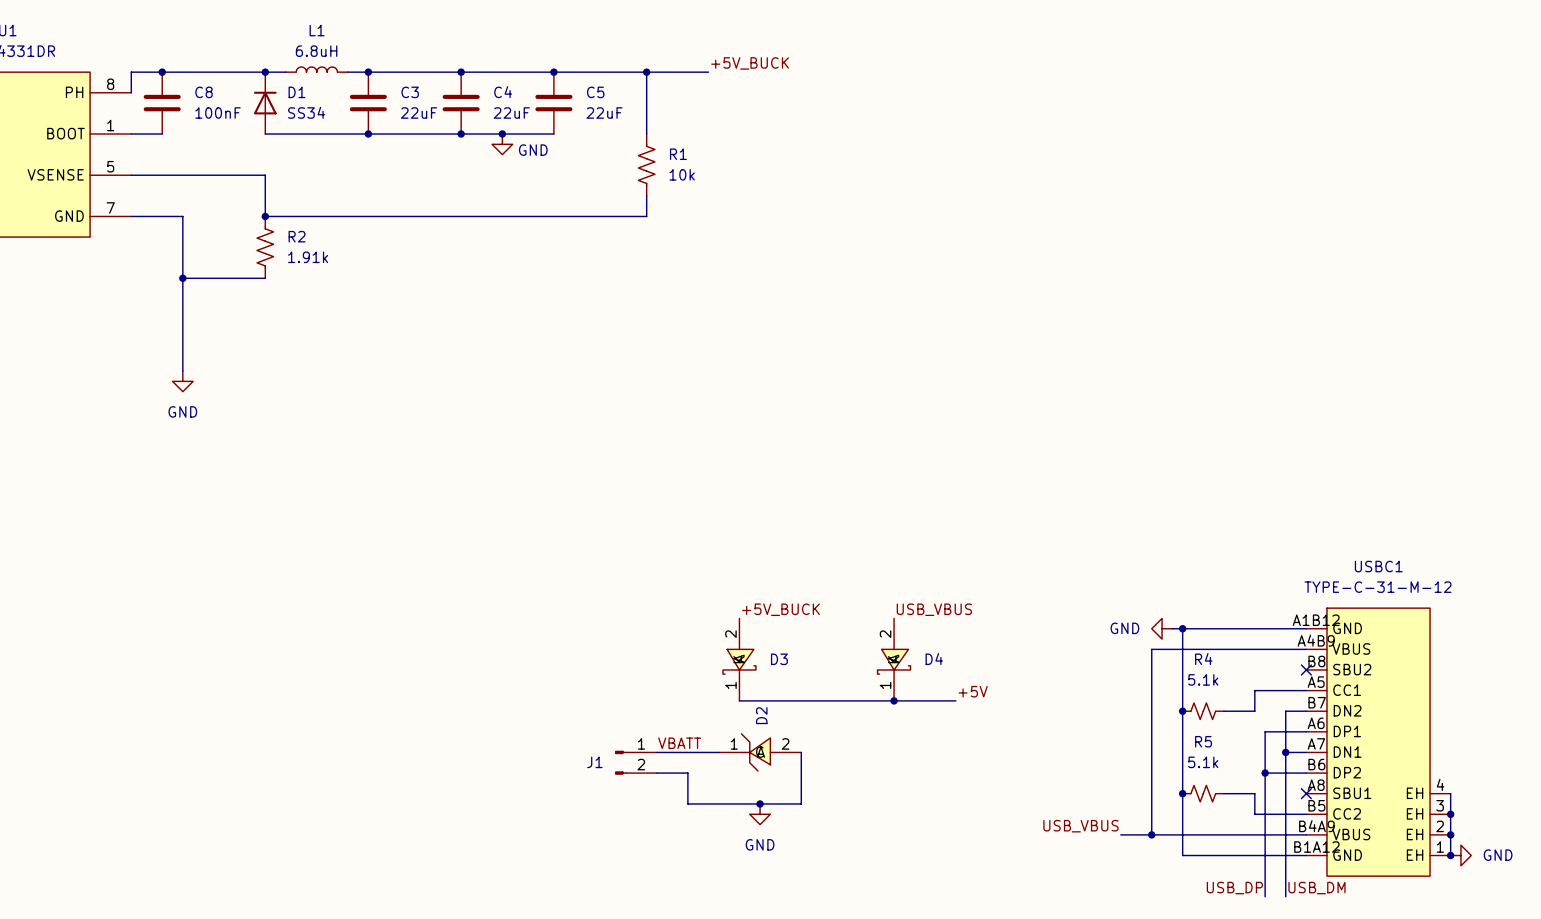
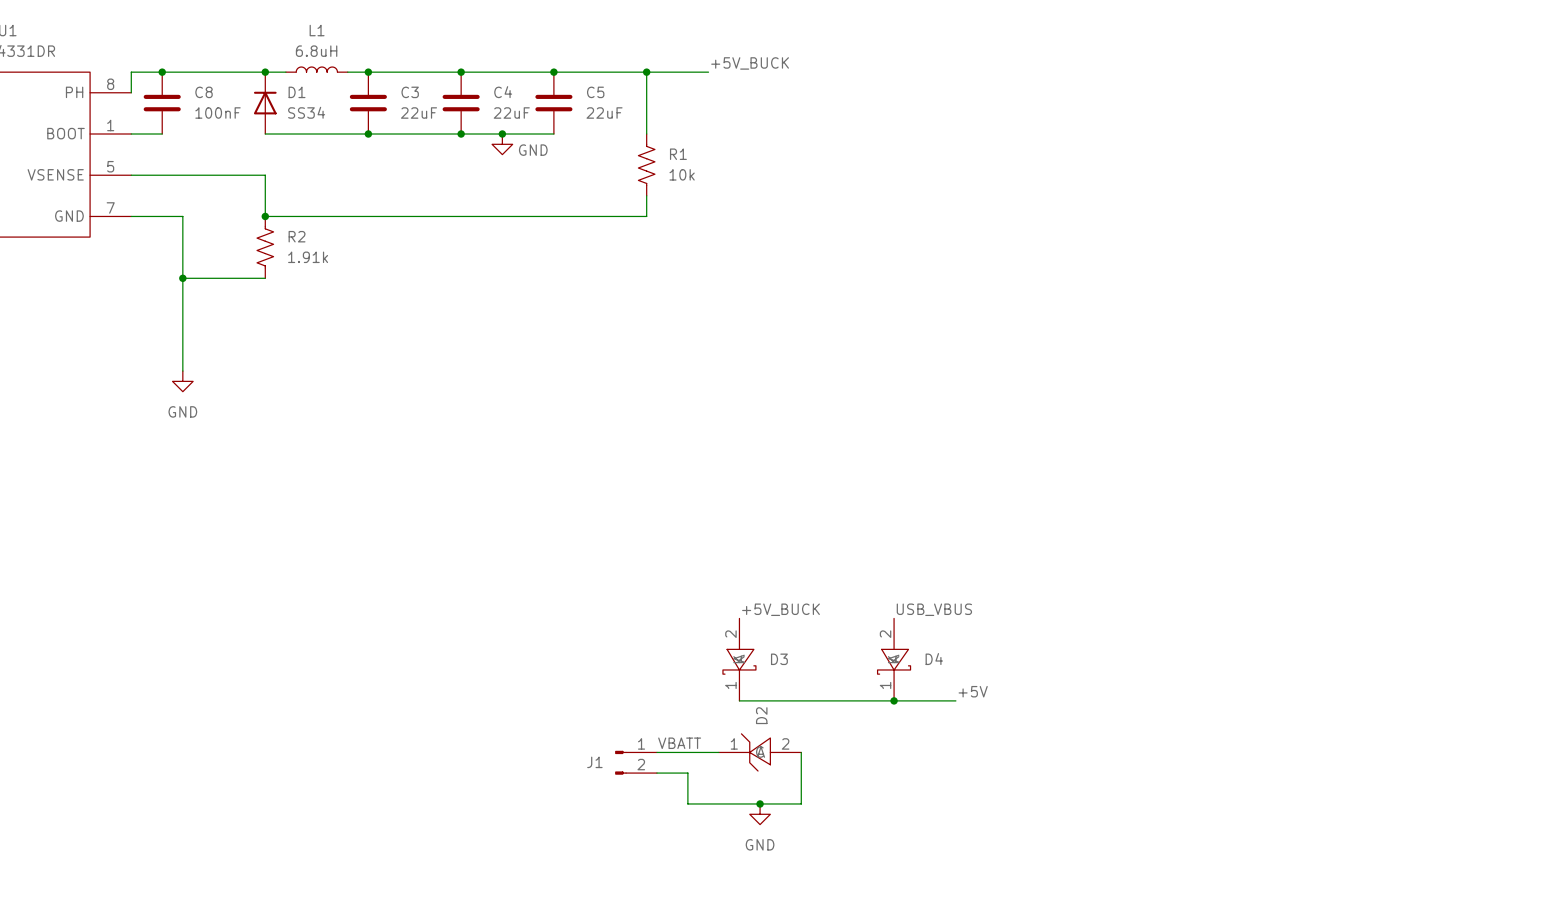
power symbol: GND (1162, 628) -> none
wire: (1172, 628) (1306, 628) -> none
wire: (1182, 628) (1182, 855) (1306, 855) -> none
junction: (1182, 628) -> none
wire: (1306, 649) (1151, 649) (1151, 834) -> none
no-connect mark: (1306, 669) -> none
wire: (1306, 690) (1254, 690) (1254, 711) (1223, 711) -> none
junction: (1182, 711) -> none
R4: 5.1k (1203, 711) -> none
wire: (1306, 711) (1285, 711) (1285, 896) -> none
wire: (1306, 731) (1265, 731) (1265, 896) -> none
USBC1: TYPE-C-31-M-12 (1378, 742) -> none
wire: (1285, 752) (1306, 752) -> none
junction: (1285, 752) -> none
wire: (1265, 773) (1306, 773) -> none
junction: (1265, 773) -> none
junction: (1182, 793) -> none
R5: 5.1k (1203, 793) -> none
wire: (1223, 793) (1254, 793) (1254, 814) (1306, 814) -> none
no-connect mark: (1306, 793) -> none
wire: (1450, 793) (1450, 855) -> none
junction: (1450, 814) -> none
label: USB_VBUS (1080, 826) -> none
wire: (1120, 834) (1306, 834) -> none
junction: (1151, 834) -> none
junction: (1450, 834) -> none
junction: (1450, 855) -> none
power symbol: GND (1460, 855) -> none
label: USB_DP (1234, 888) -> none
label: USB_DM (1316, 888) -> none

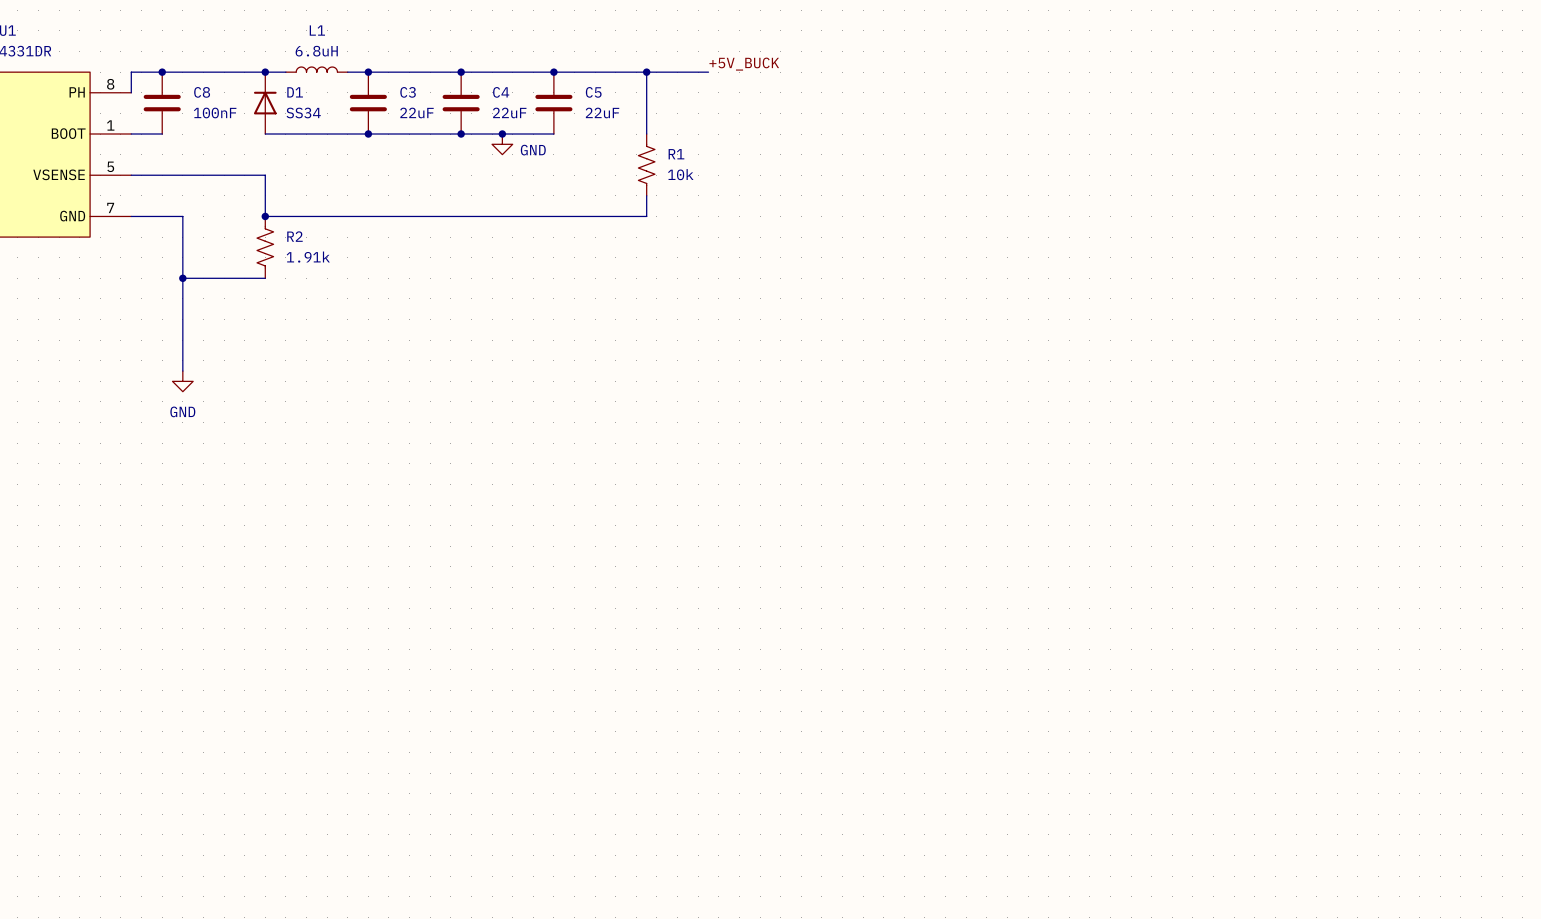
label: +5V_BUCK (780, 609) -> none
label: USB_VBUS (934, 609) -> none
D3: (739, 659) -> none
D4: (894, 659) -> none
label: +5V (973, 691) -> none
wire: (739, 700) (955, 700) -> none
junction: (894, 700) -> none
label: VBATT (679, 743) -> none
wire: (656, 752) (718, 752) -> none
D2: (760, 752) -> none
wire: (801, 752) (801, 803) (687, 803) (687, 773) (656, 773) -> none
J1: (636, 762) -> none
junction: (760, 803) -> none
power symbol: GND (760, 814) -> none

